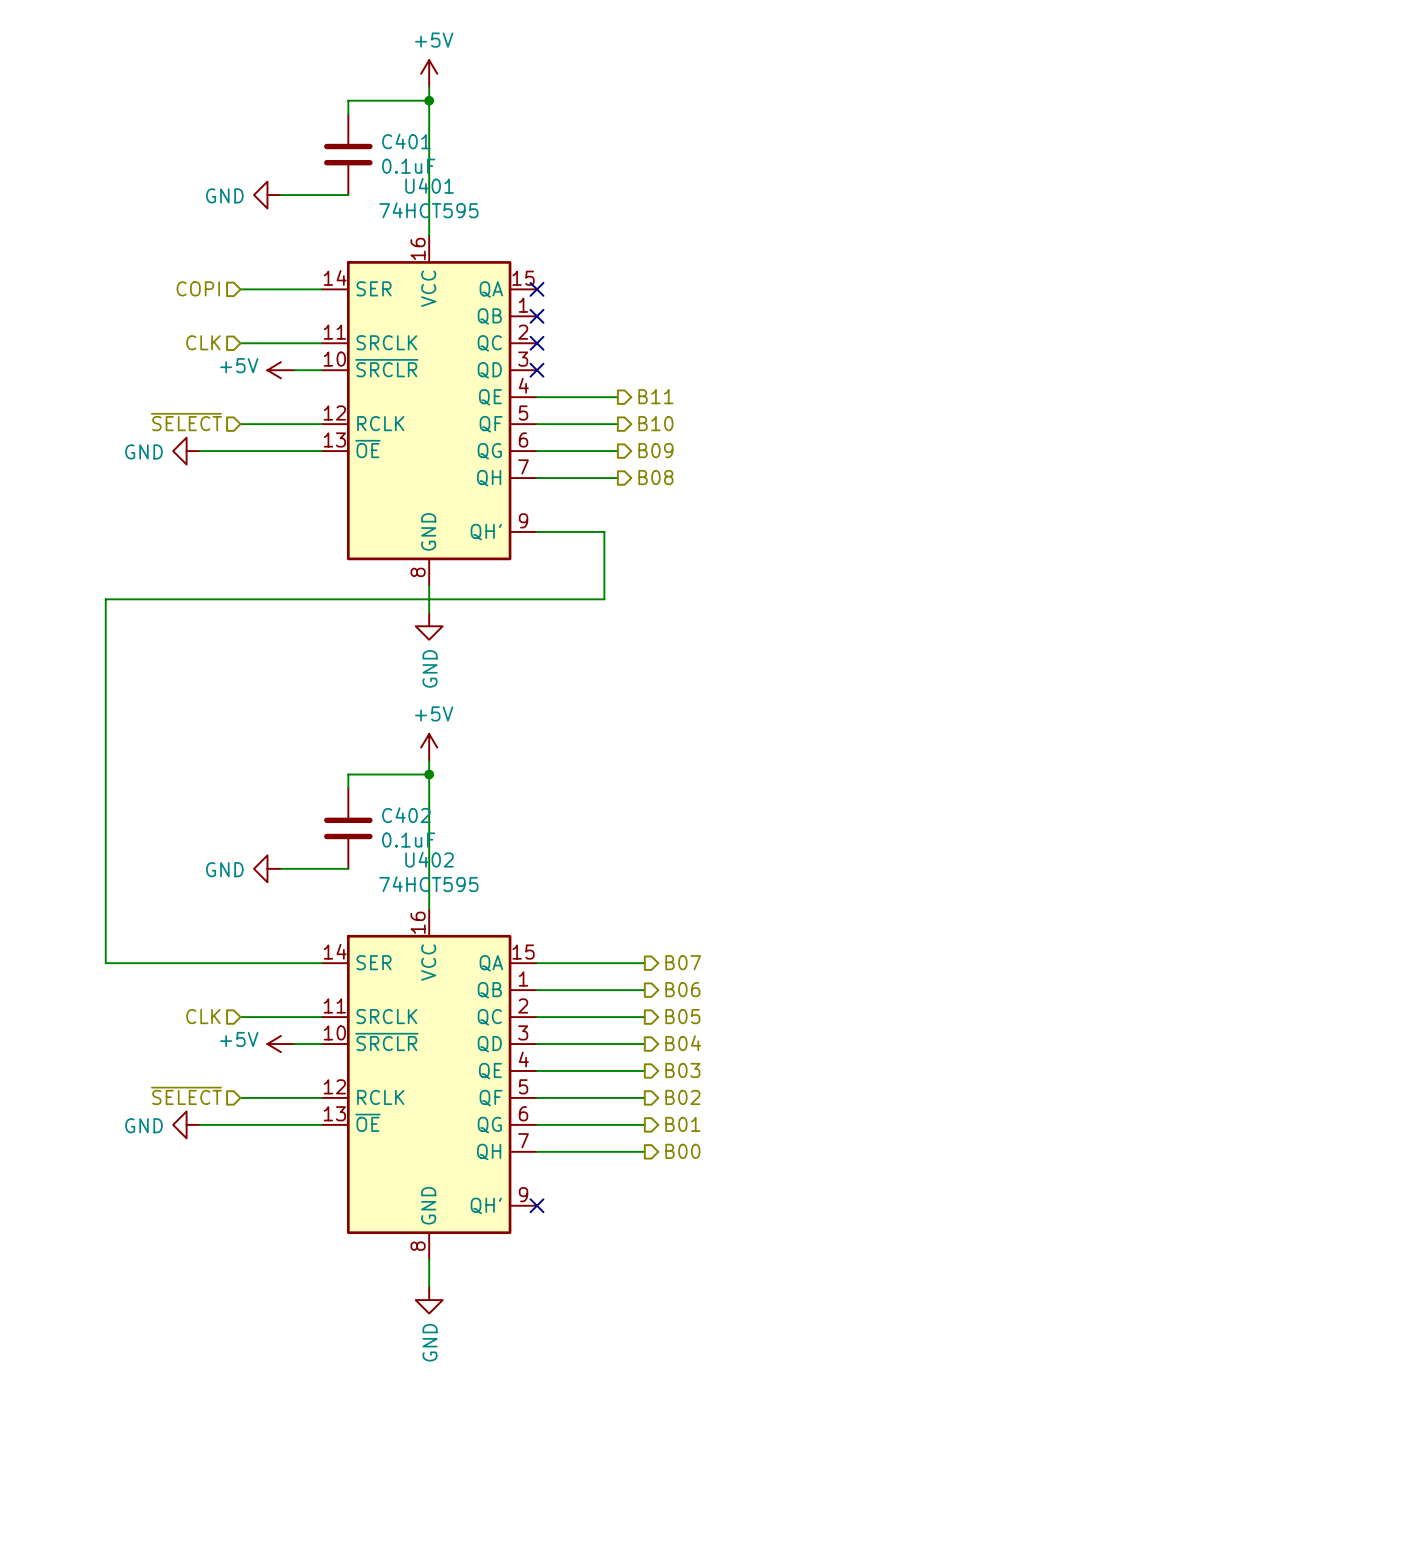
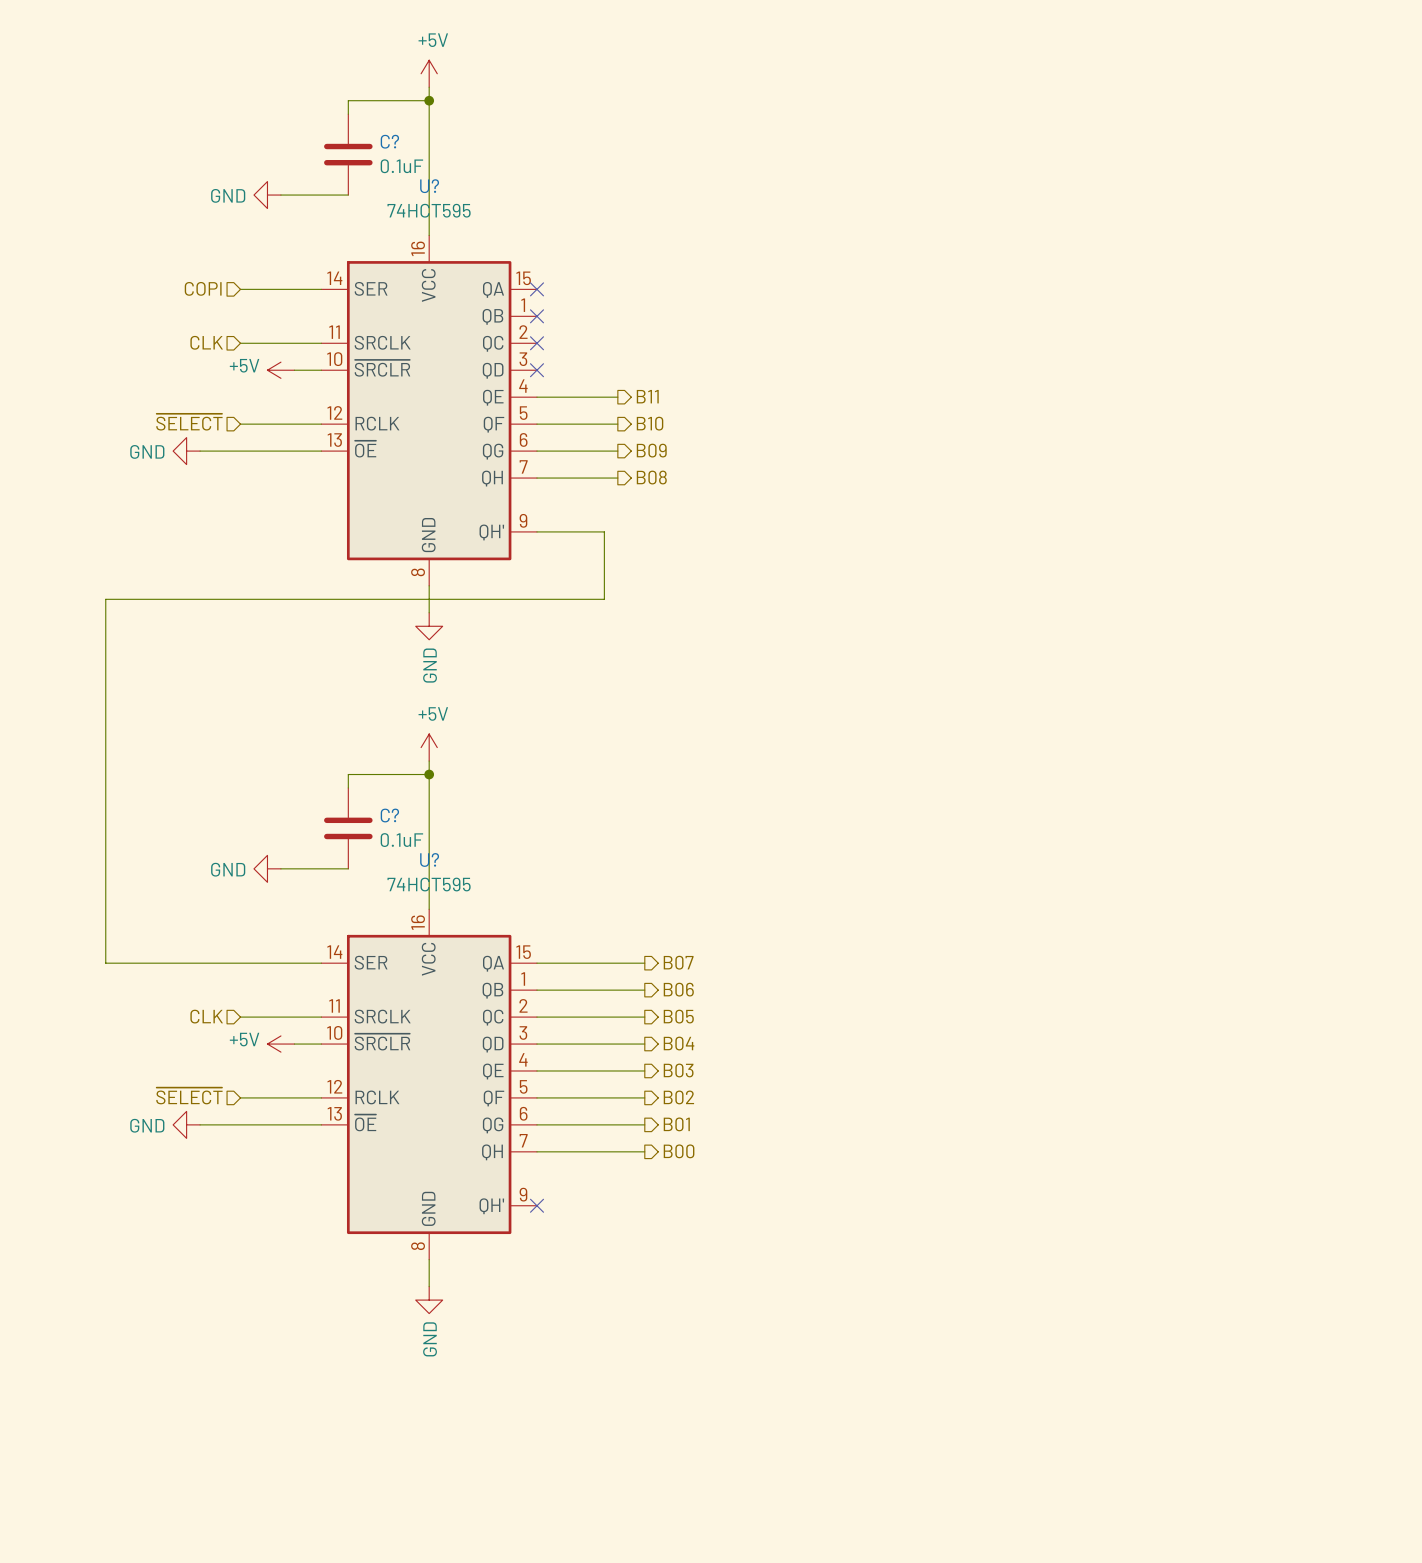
C401 name: C401 (406, 141) -> C? (389, 141)
U401 name: U401 (429, 185) -> U? (429, 186)
C402 name: C402 (406, 815) -> C? (389, 815)
U402 name: U402 (429, 859) -> U? (429, 859)

